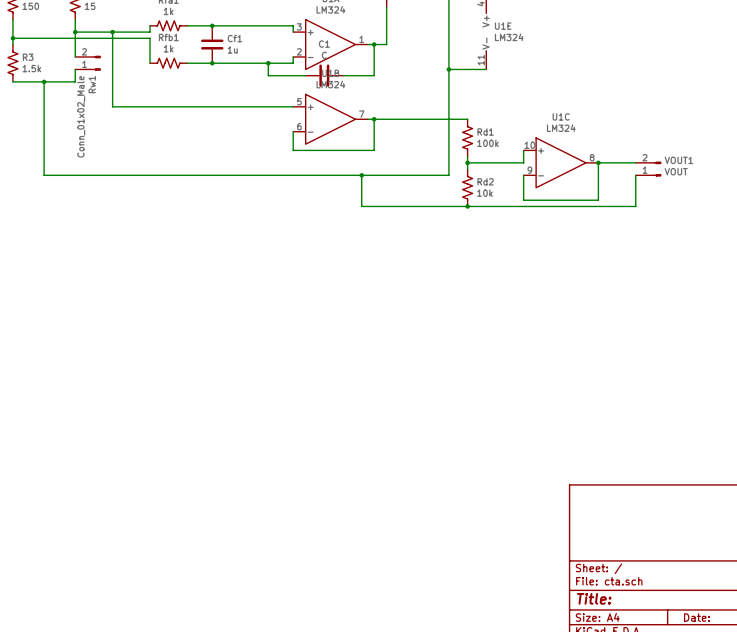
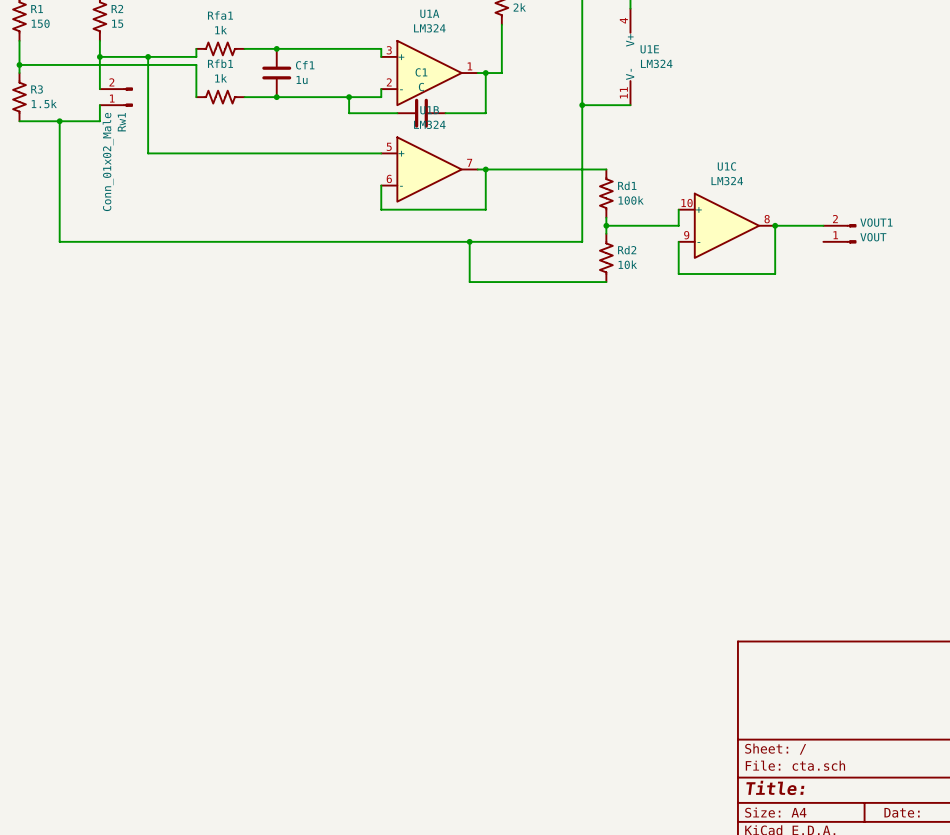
wire: (635, 175) (635, 206) (467, 206) -> none
junction: (467, 206) -> none

